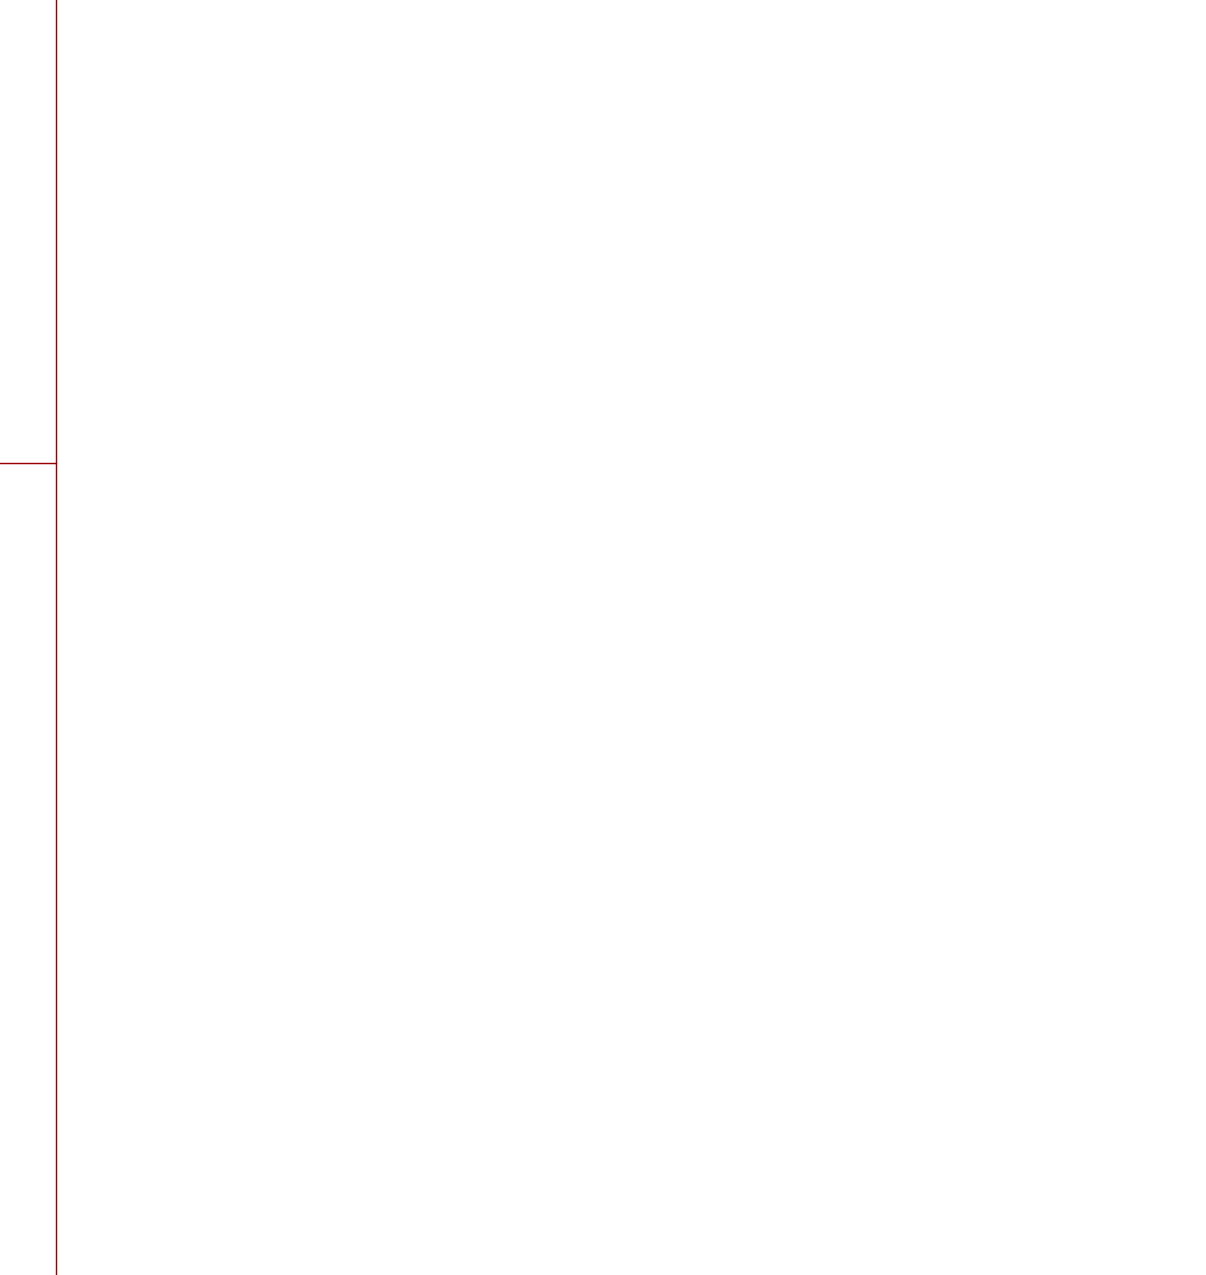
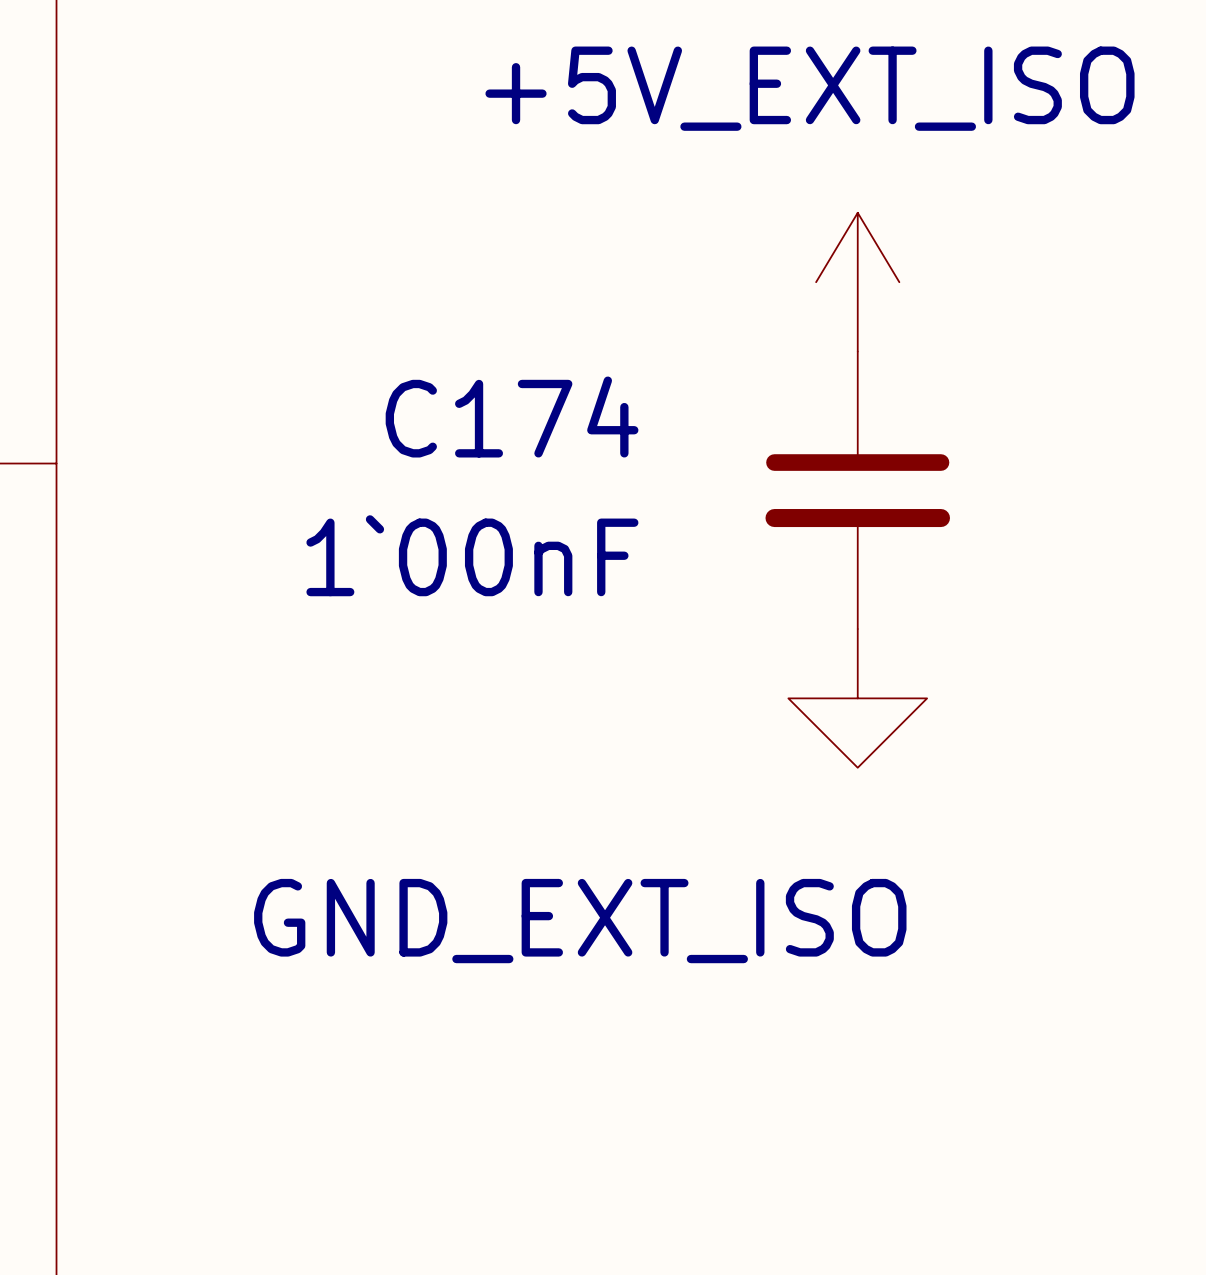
power symbol: none -> +5V_EXT_ISO (857, 282)
C174: none -> 1`00nF (857, 490)
power symbol: none -> GND_EXT_ISO (857, 698)

